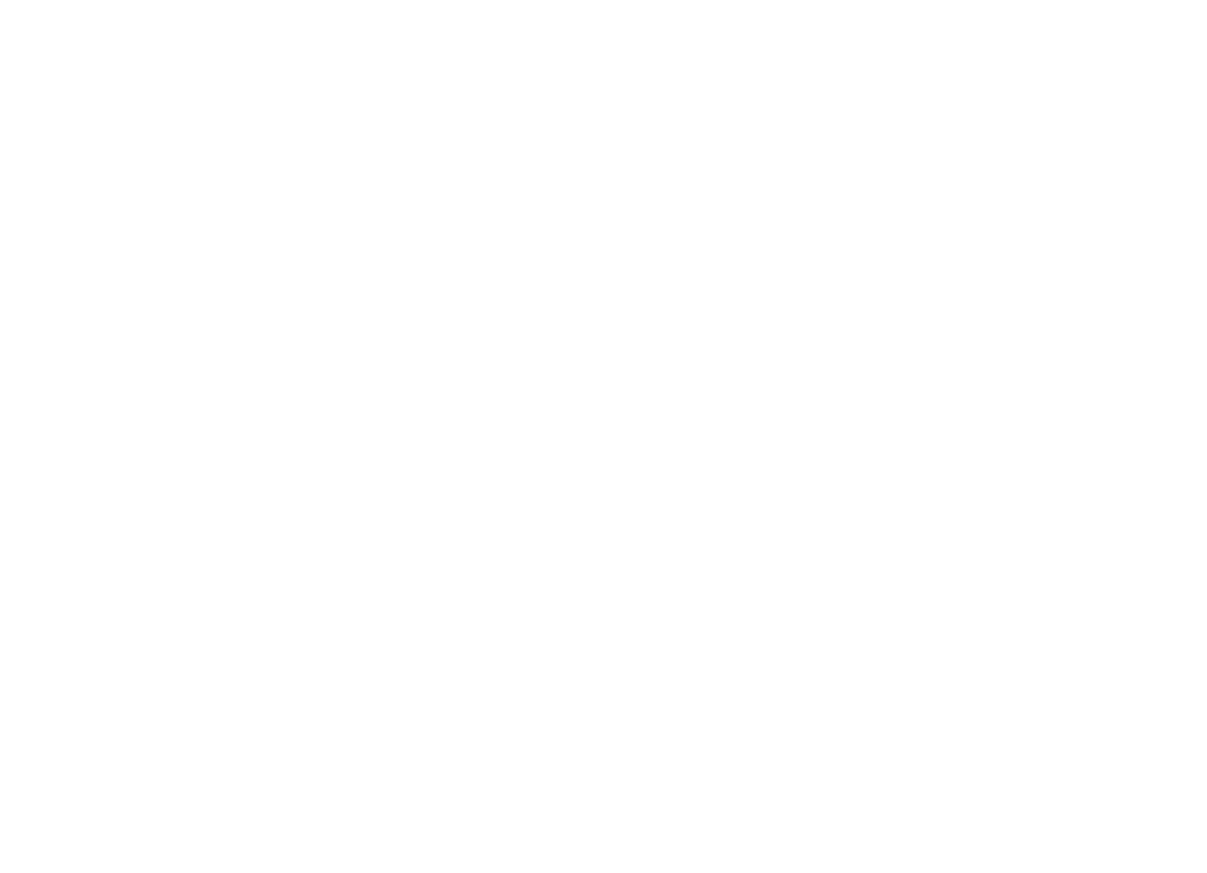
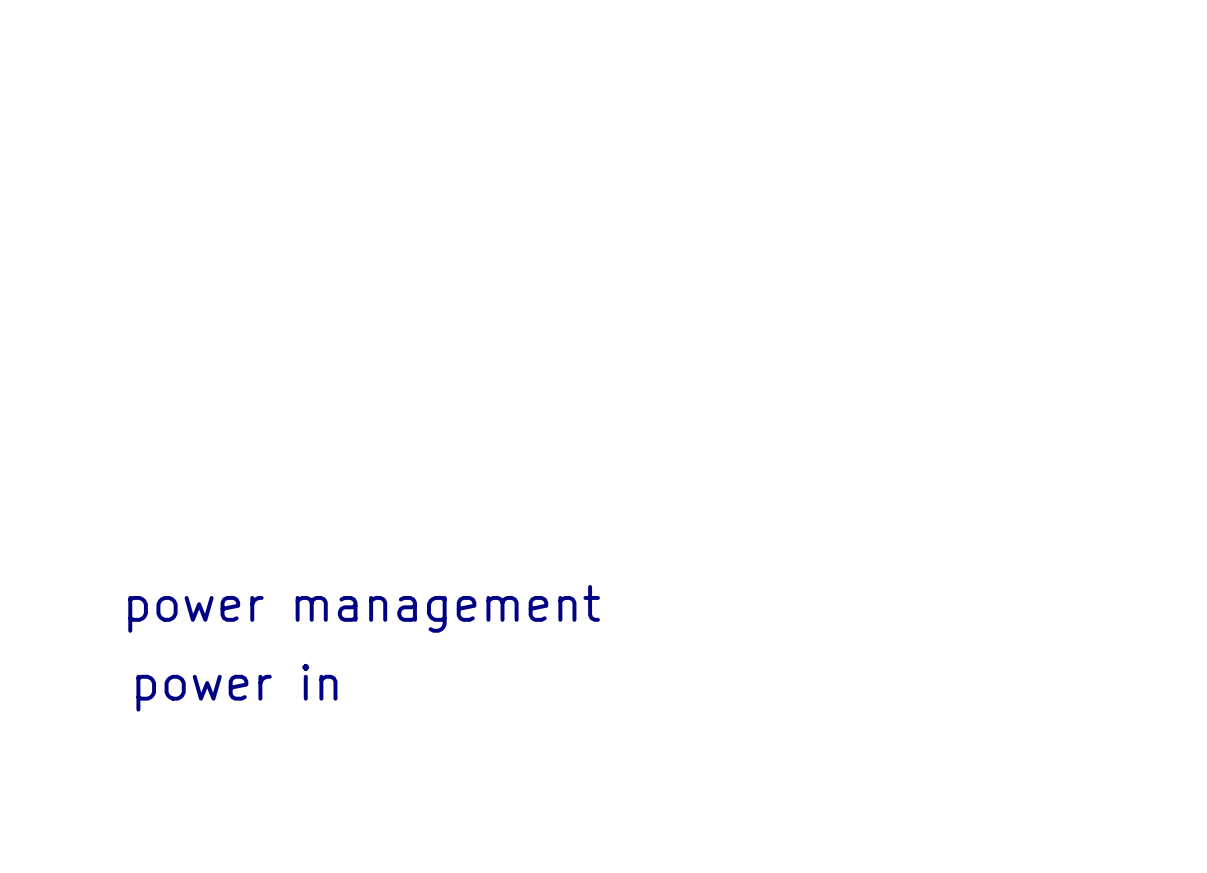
text: none -> power management (364, 608)
text: none -> power in (236, 687)

